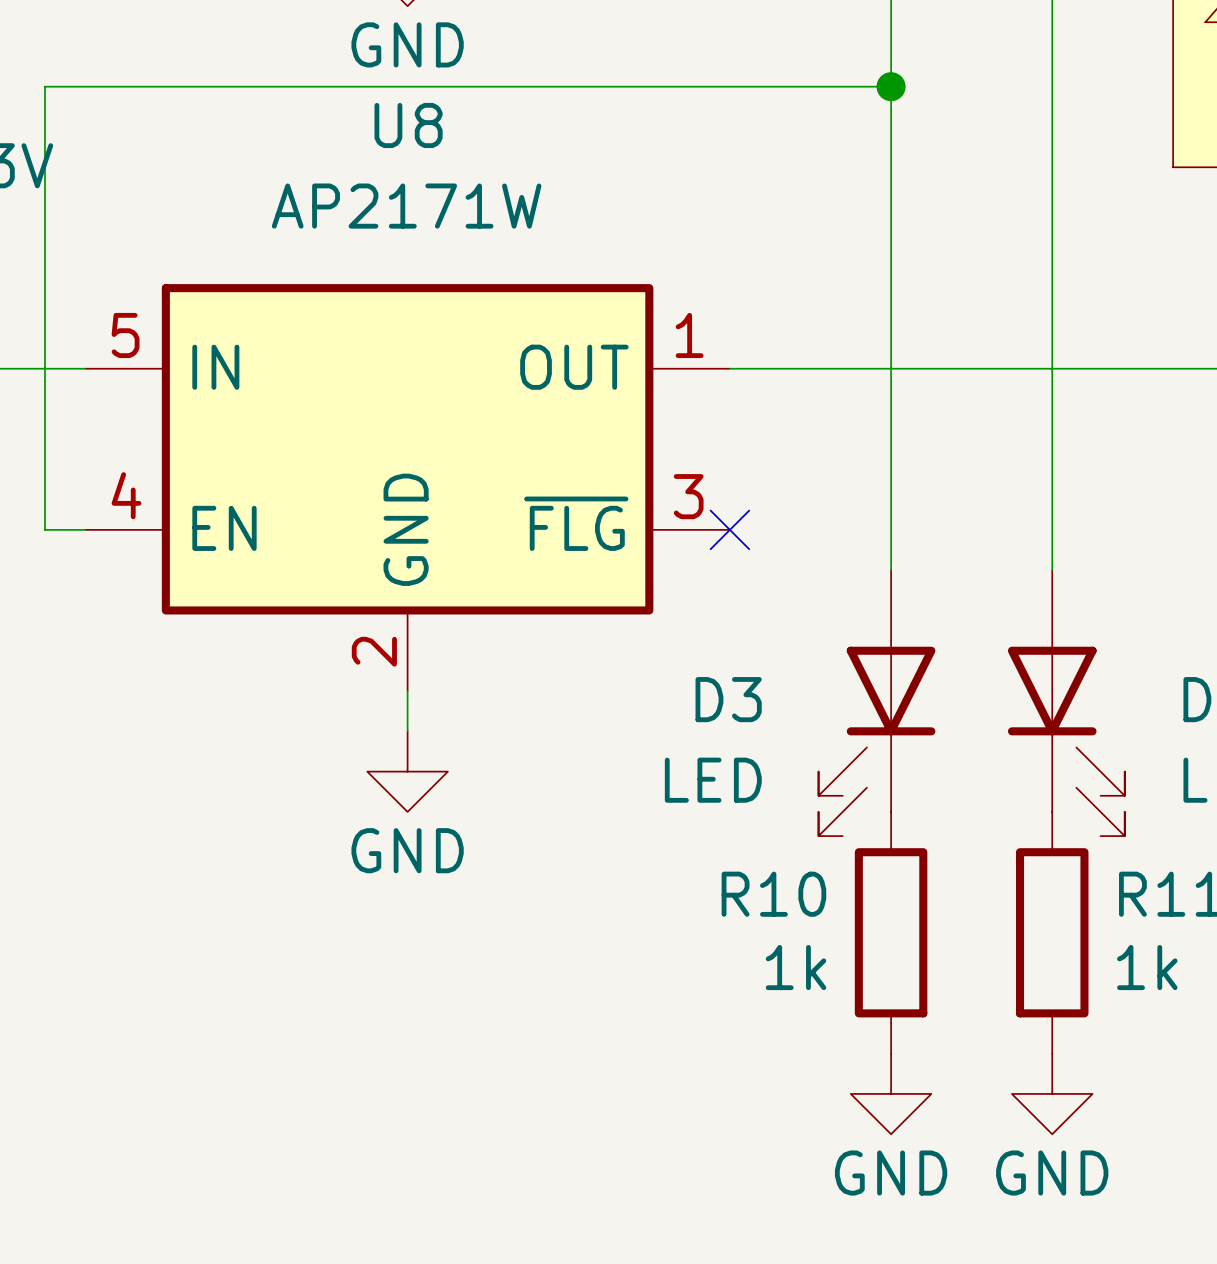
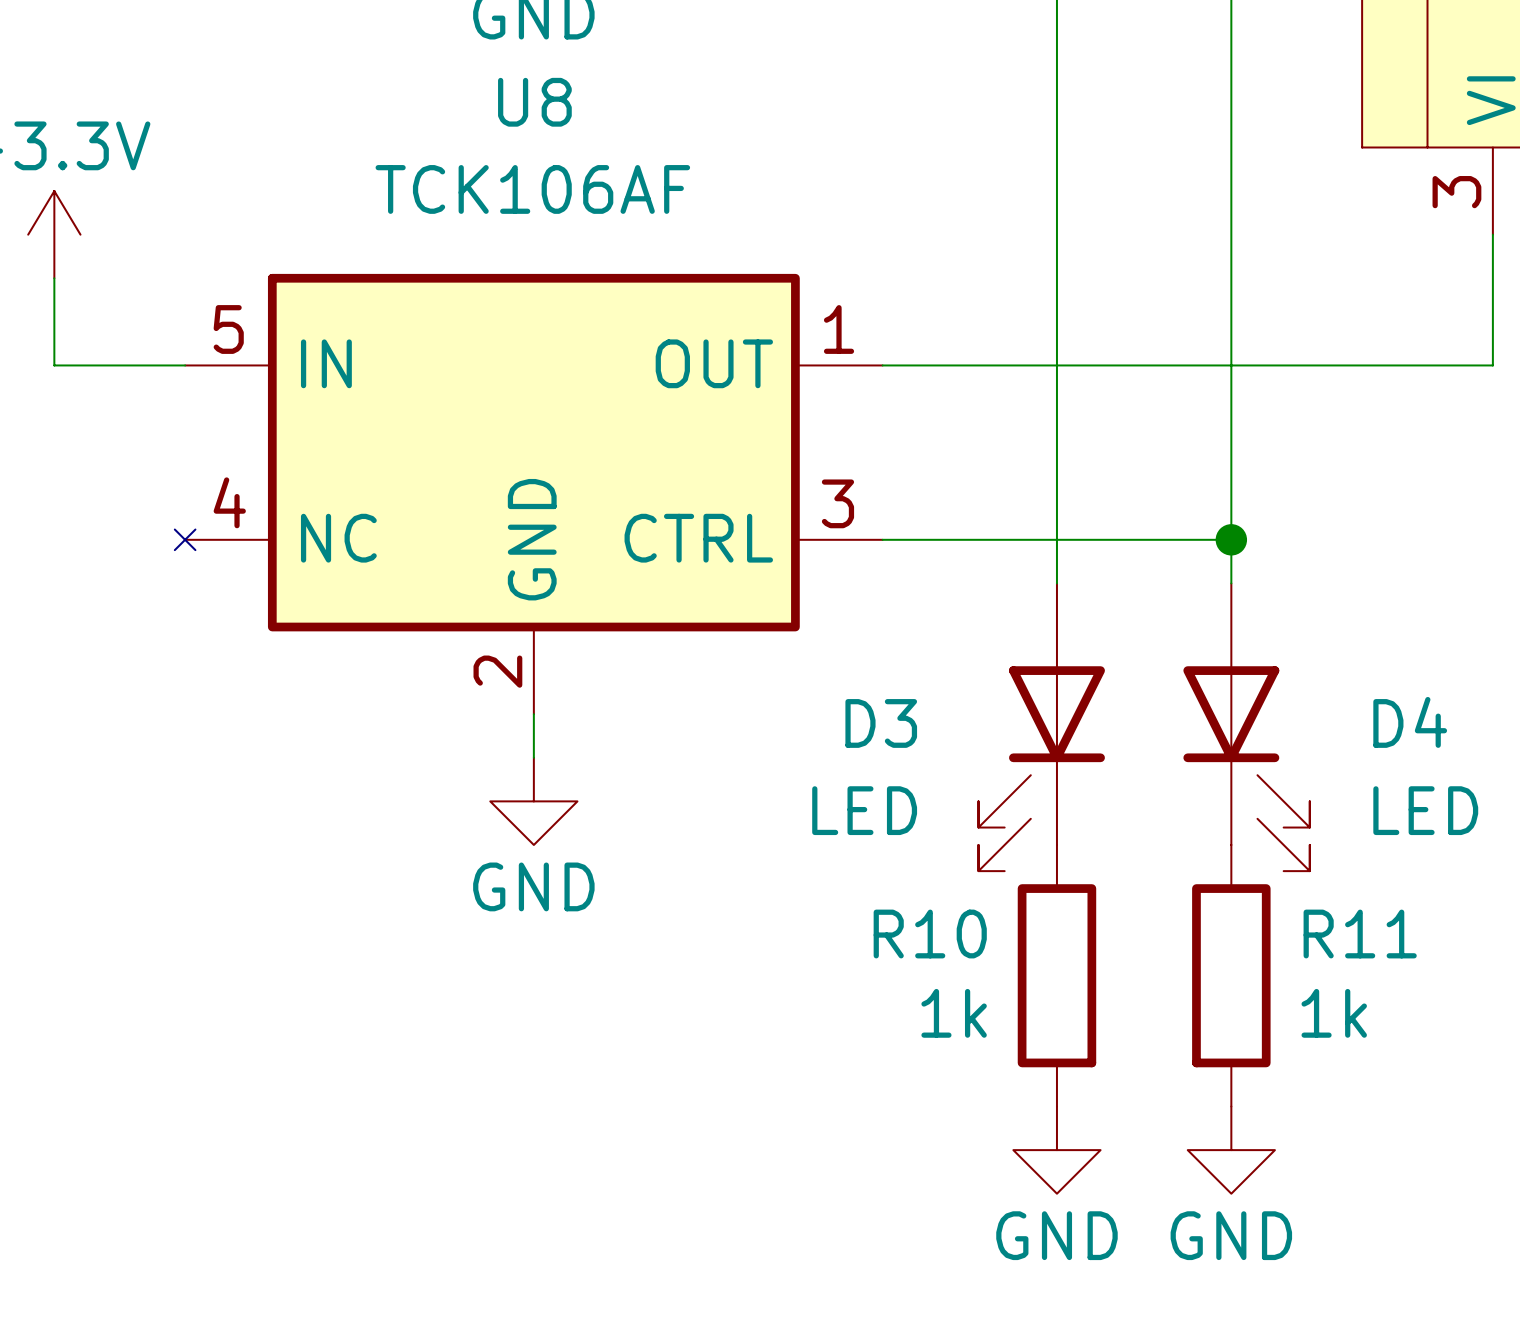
wire: (891, 86) (44, 86) (44, 529) (85, 529) -> none
junction: (891, 86) -> none
U8 value: AP2171W (406, 206) -> TCK106AF (532, 189)
U8 symbol: [85, 284, 730, 692] -> [174, 273, 883, 715]
wire: none -> (882, 539) (1231, 539)
no-connect mark: (729, 529) -> none
junction: none -> (1231, 539)

